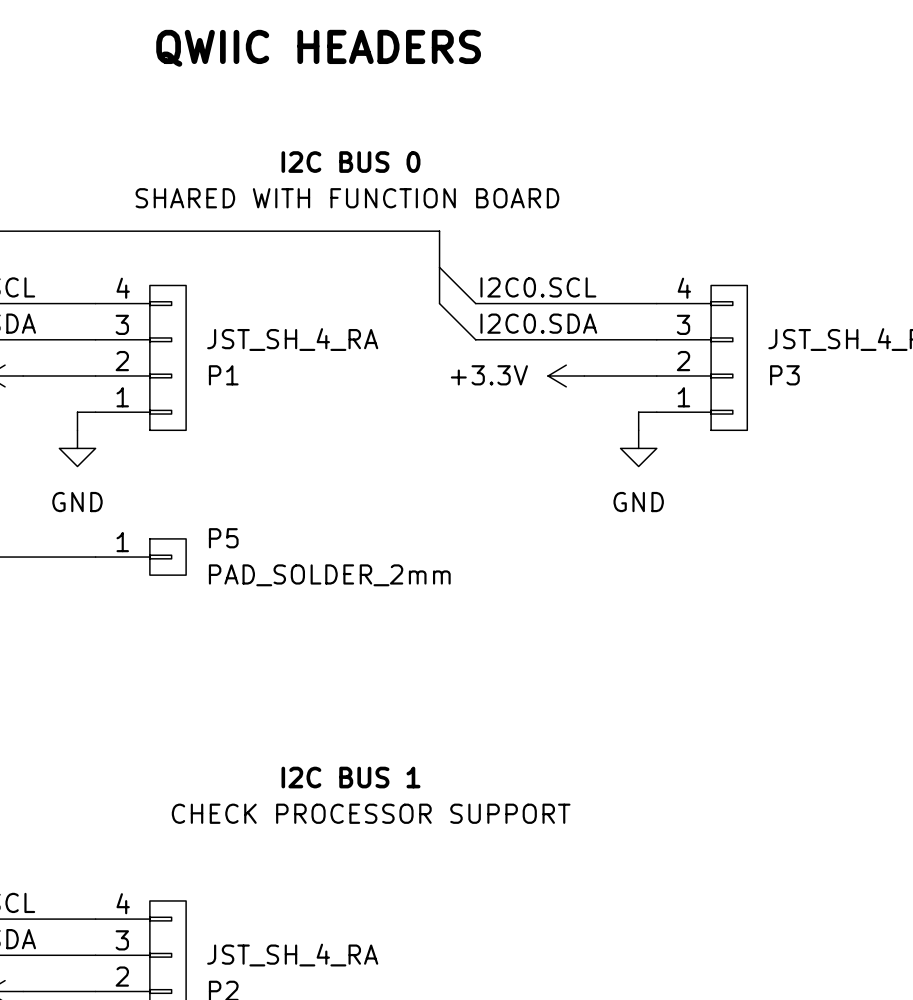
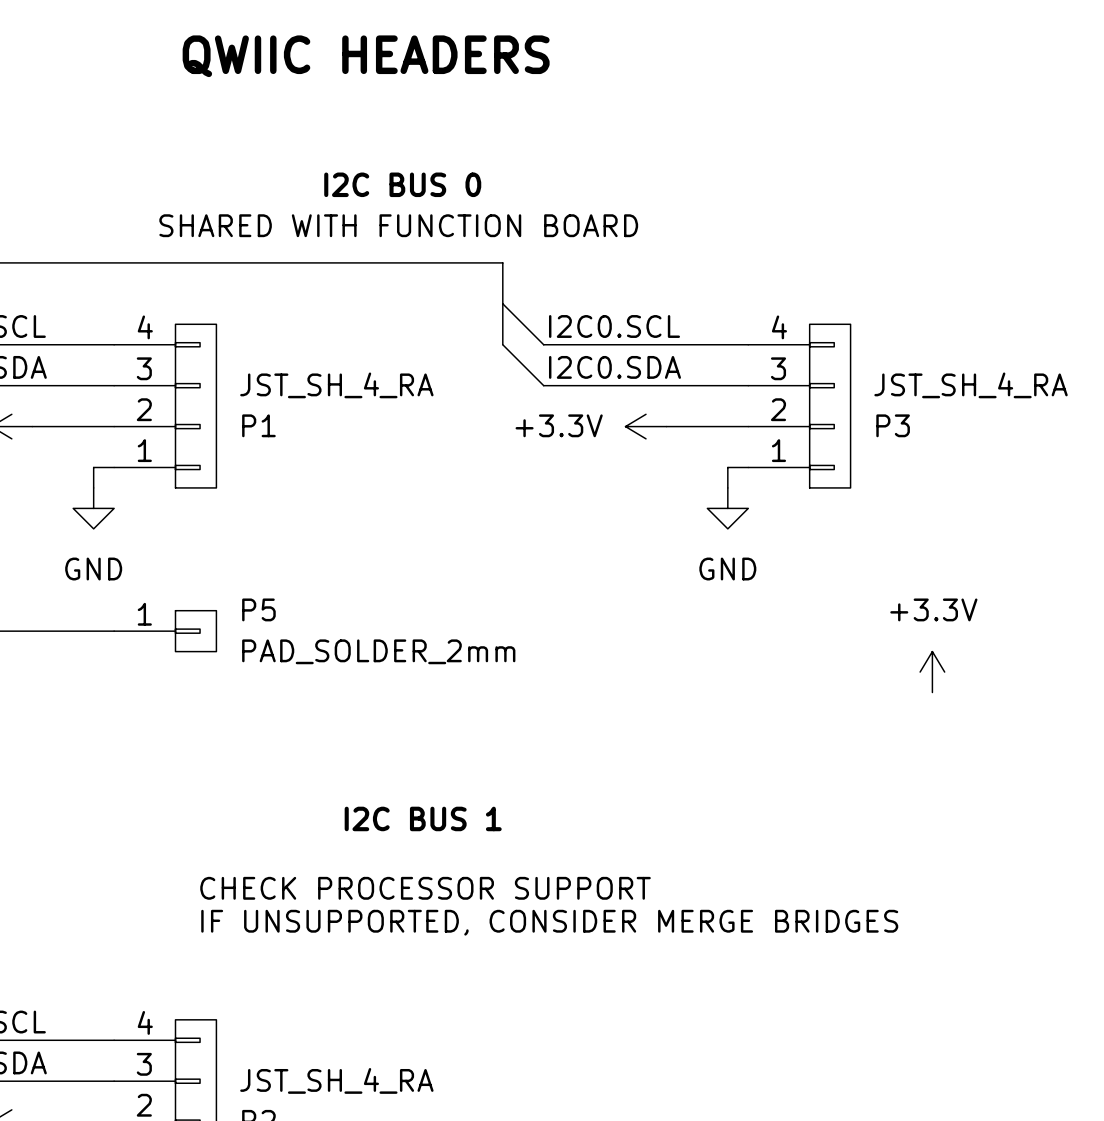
power symbol: none -> +3.3V (932, 672)
text position: I2C BUS 1 (350, 777) -> I2C BUS 1 (423, 818)
text: none -> CHECK PROCESSOR SUPPORT (425, 888)
text: CHECK PROCESSOR SUPPORT (371, 813) -> IF UNSUPPORTED, CONSIDER MERGE BRIDGES (549, 922)

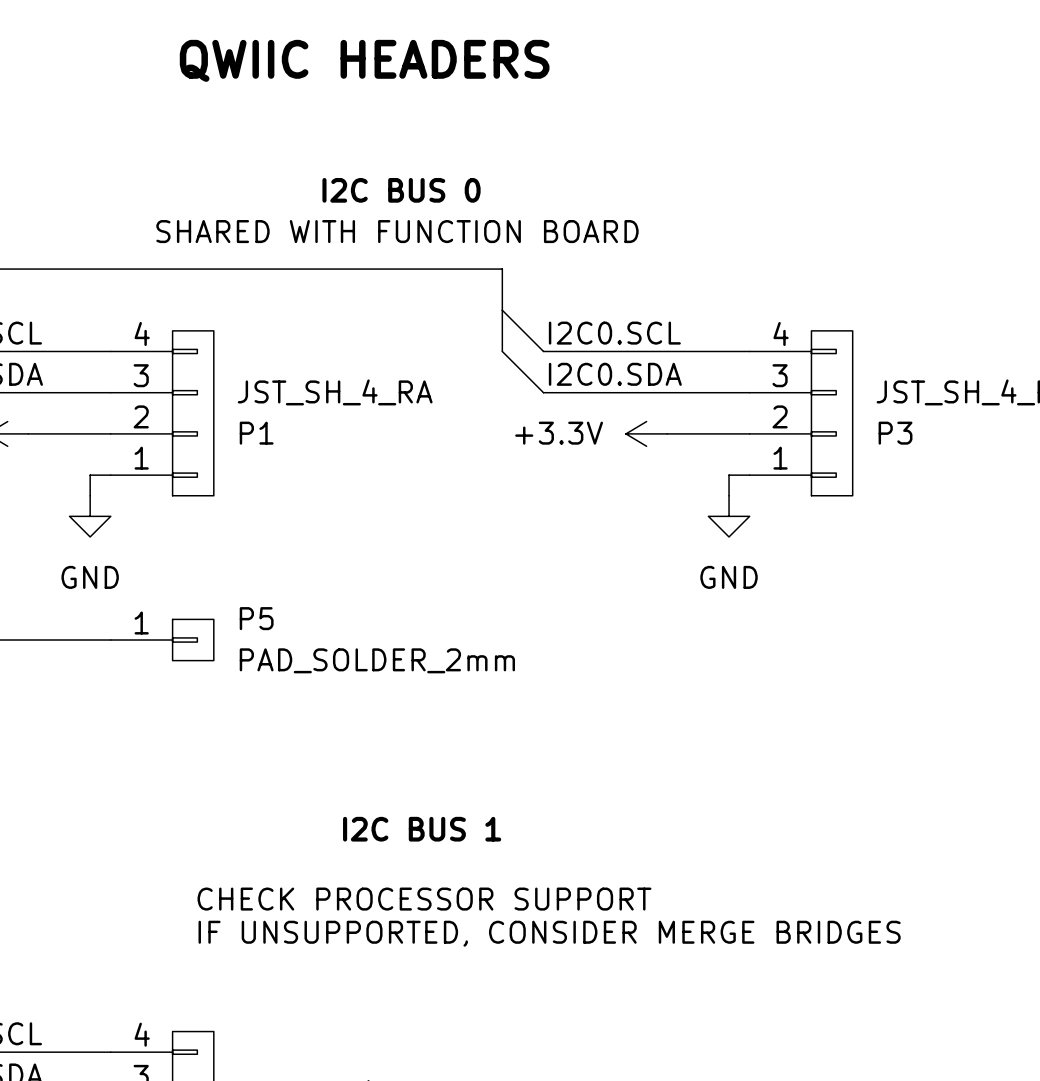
power symbol: +3.3V (932, 672) -> none

